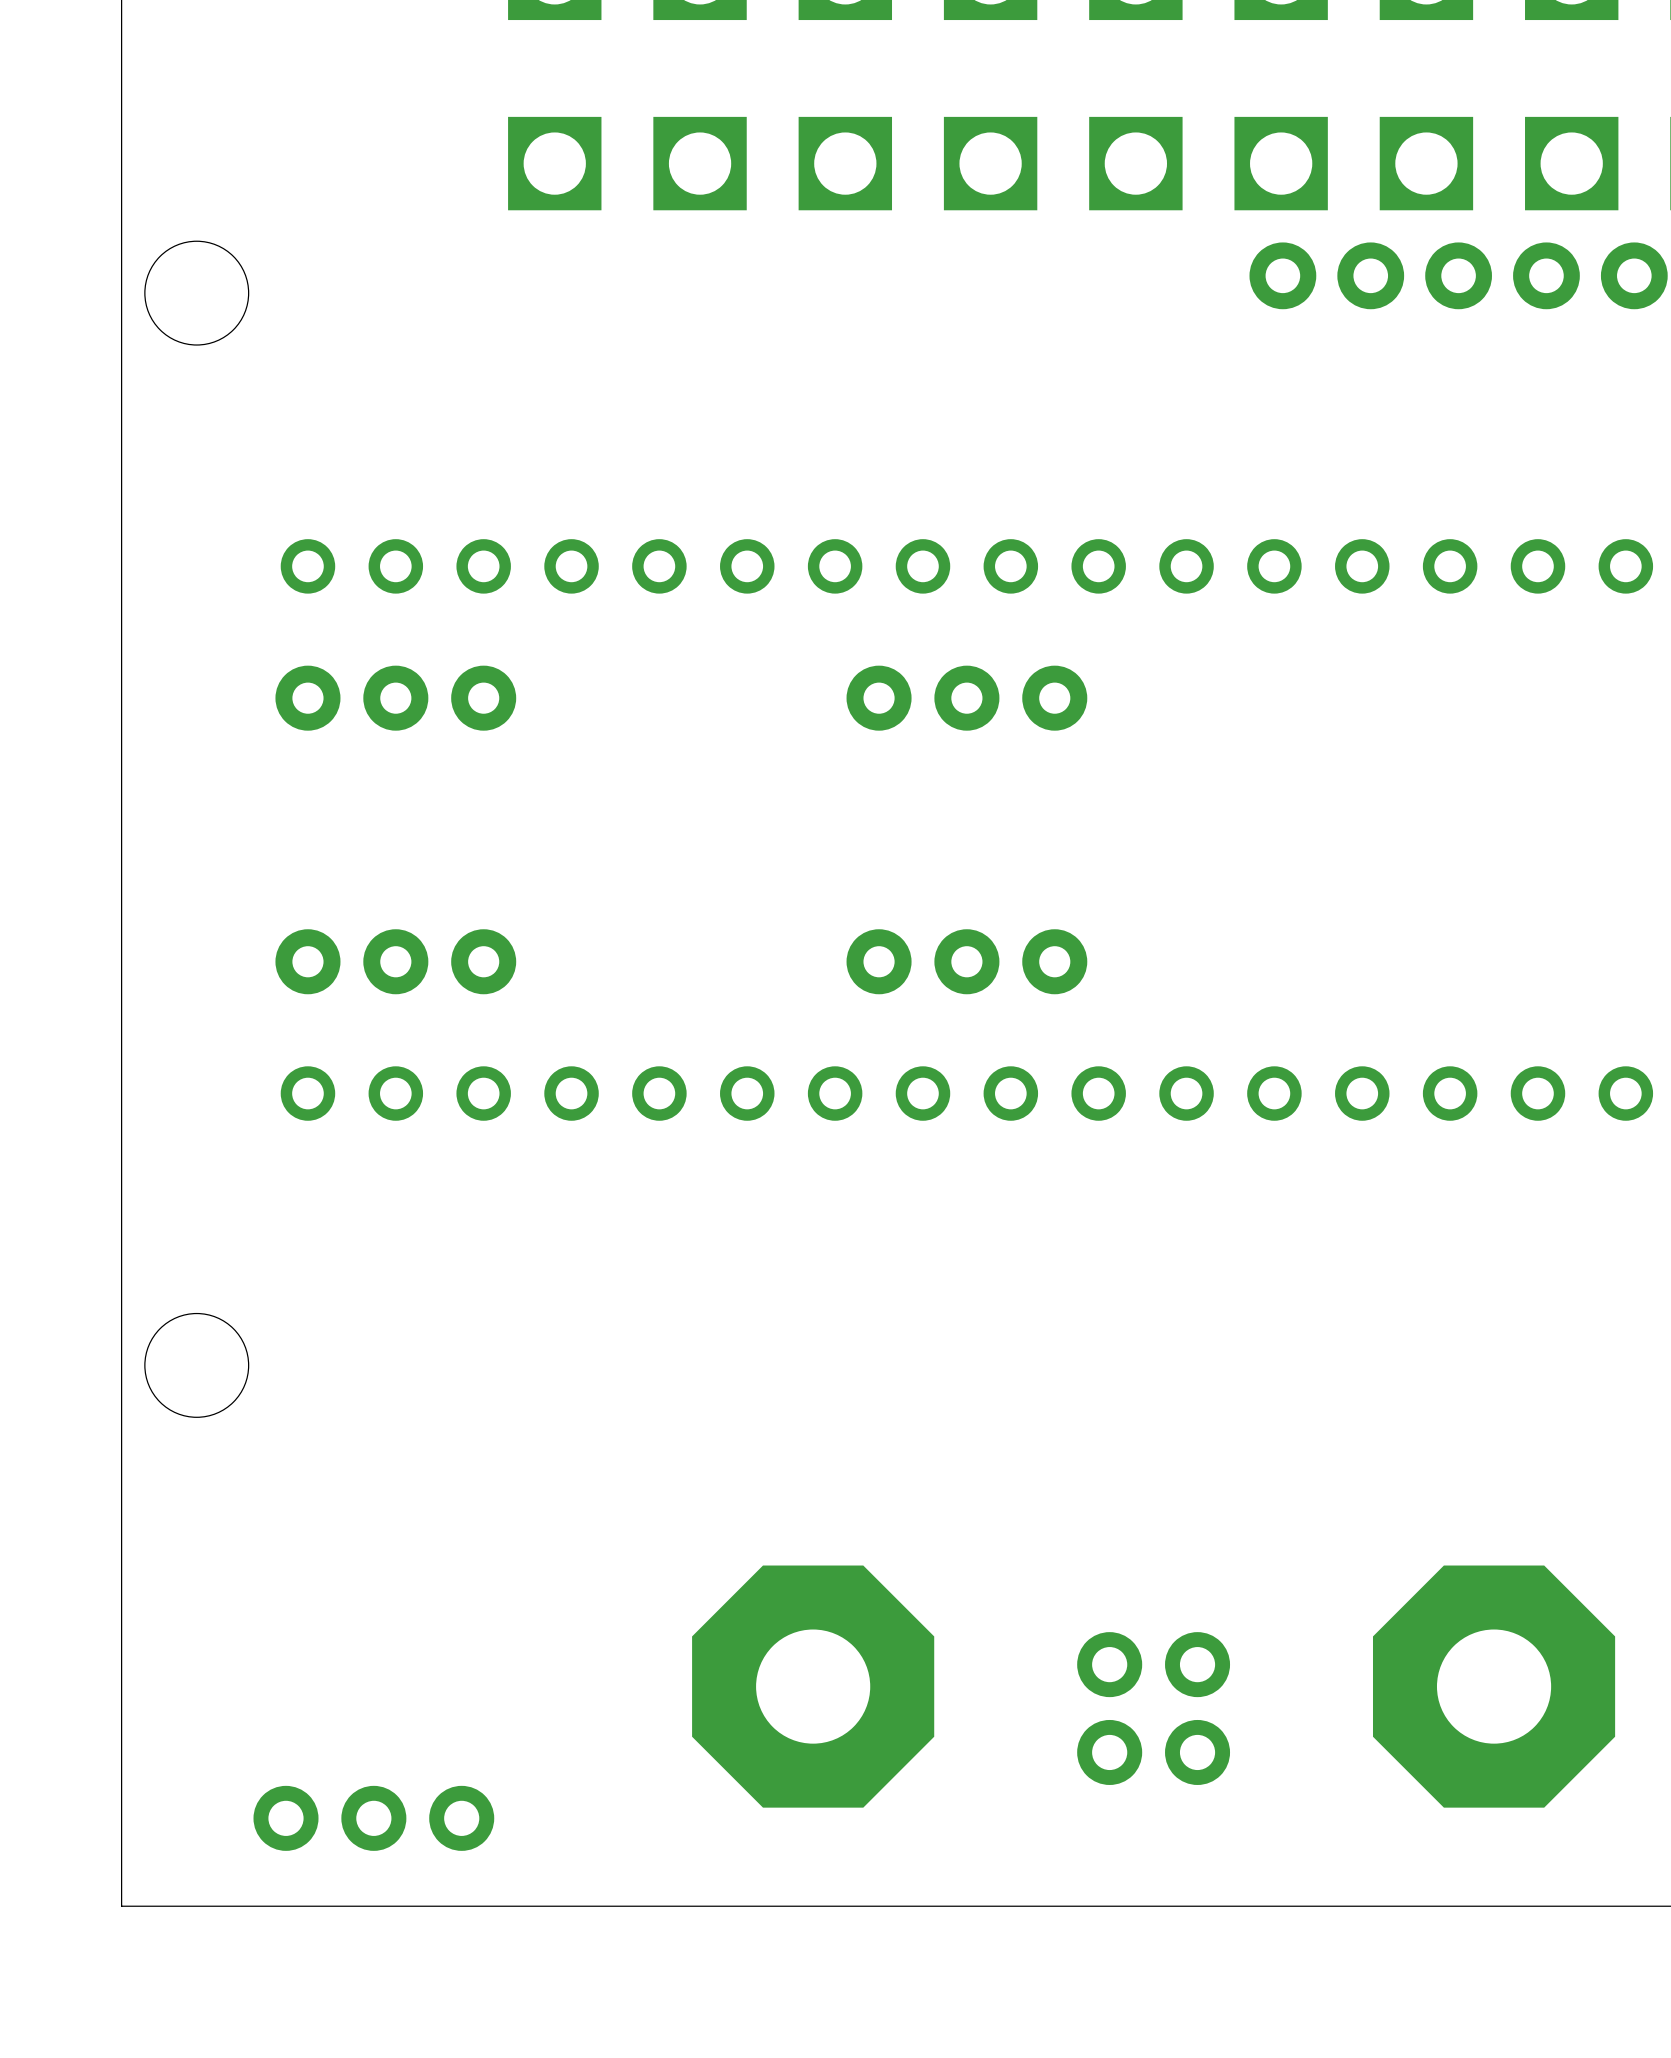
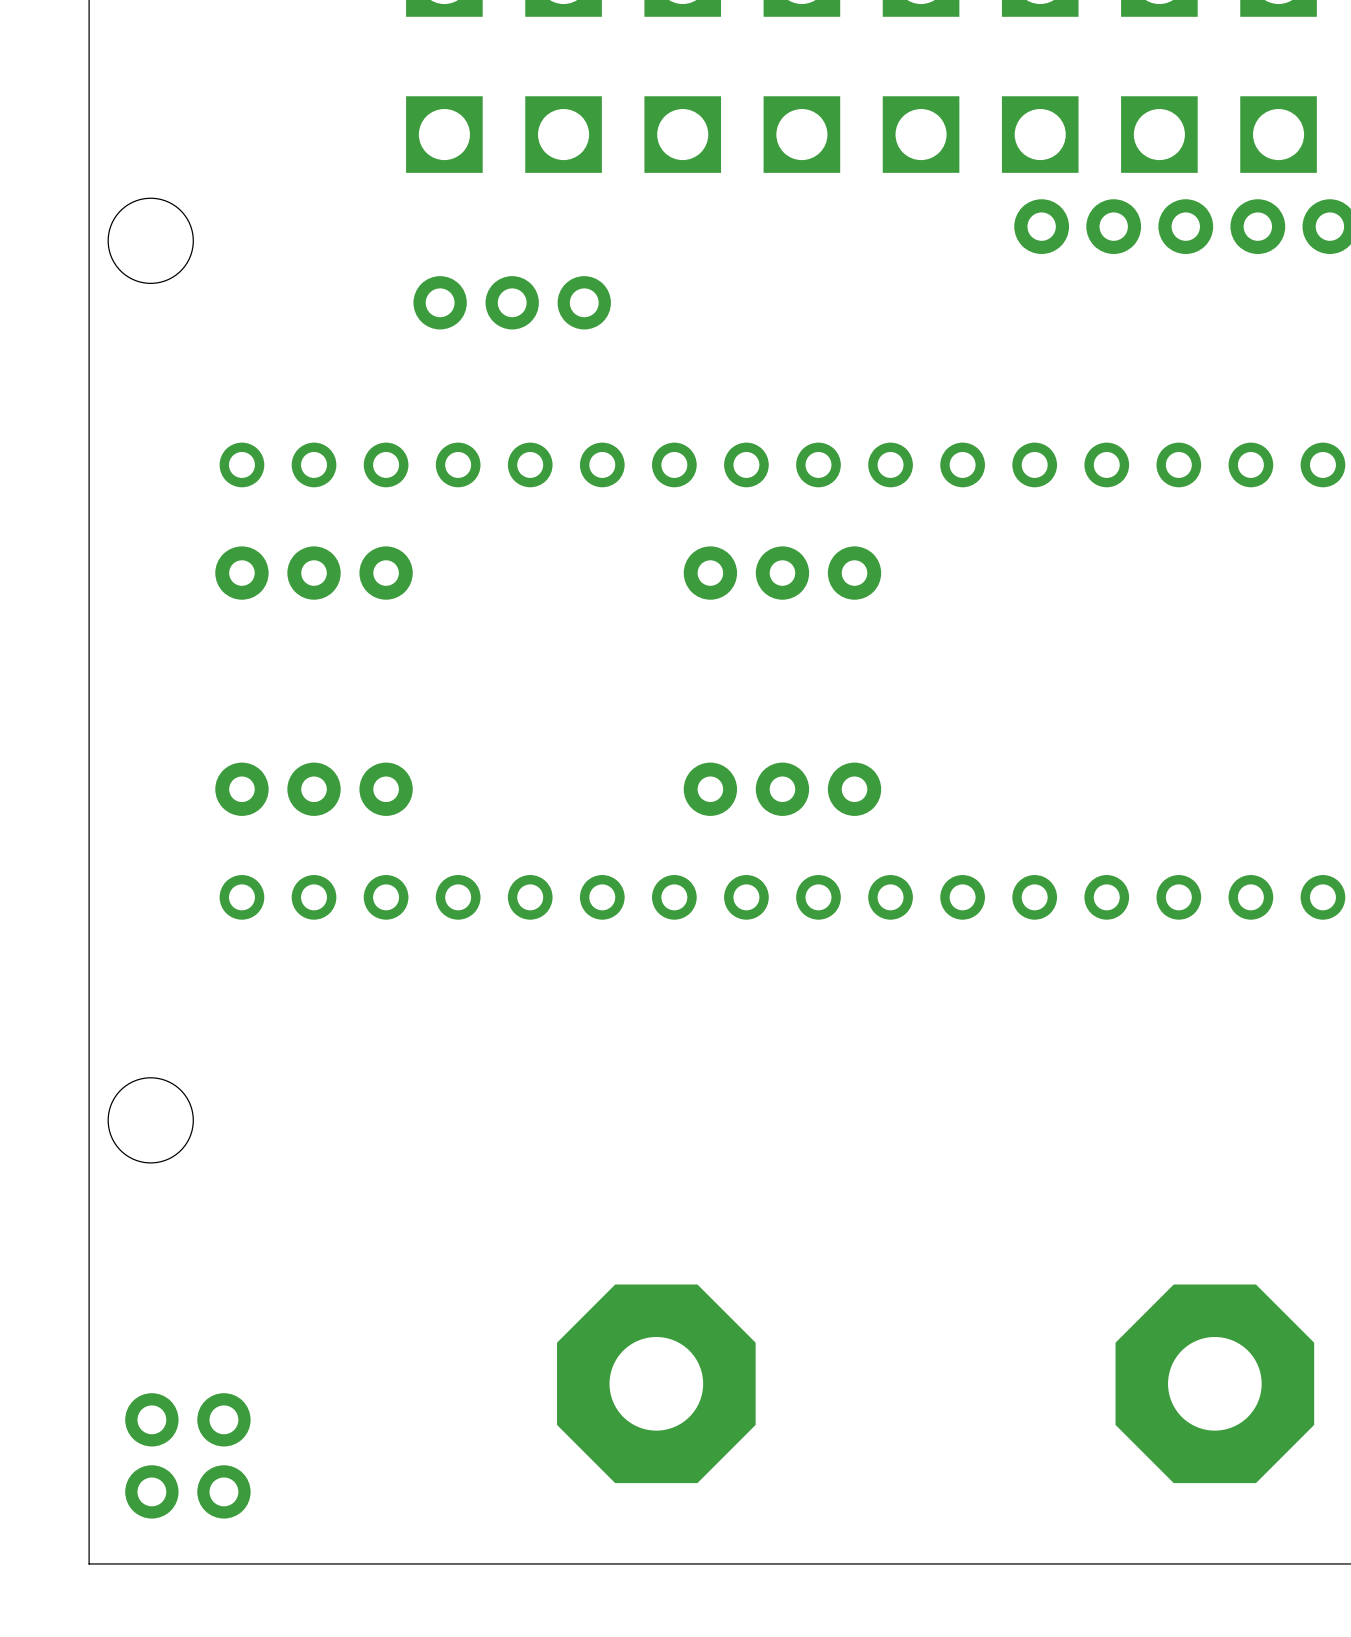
part: none -> (512, 302)
part: (1153, 1664) -> none
part: none -> (187, 1419)
part: (1153, 1752) -> none
part: none -> (187, 1491)
part: (373, 1818) -> none

